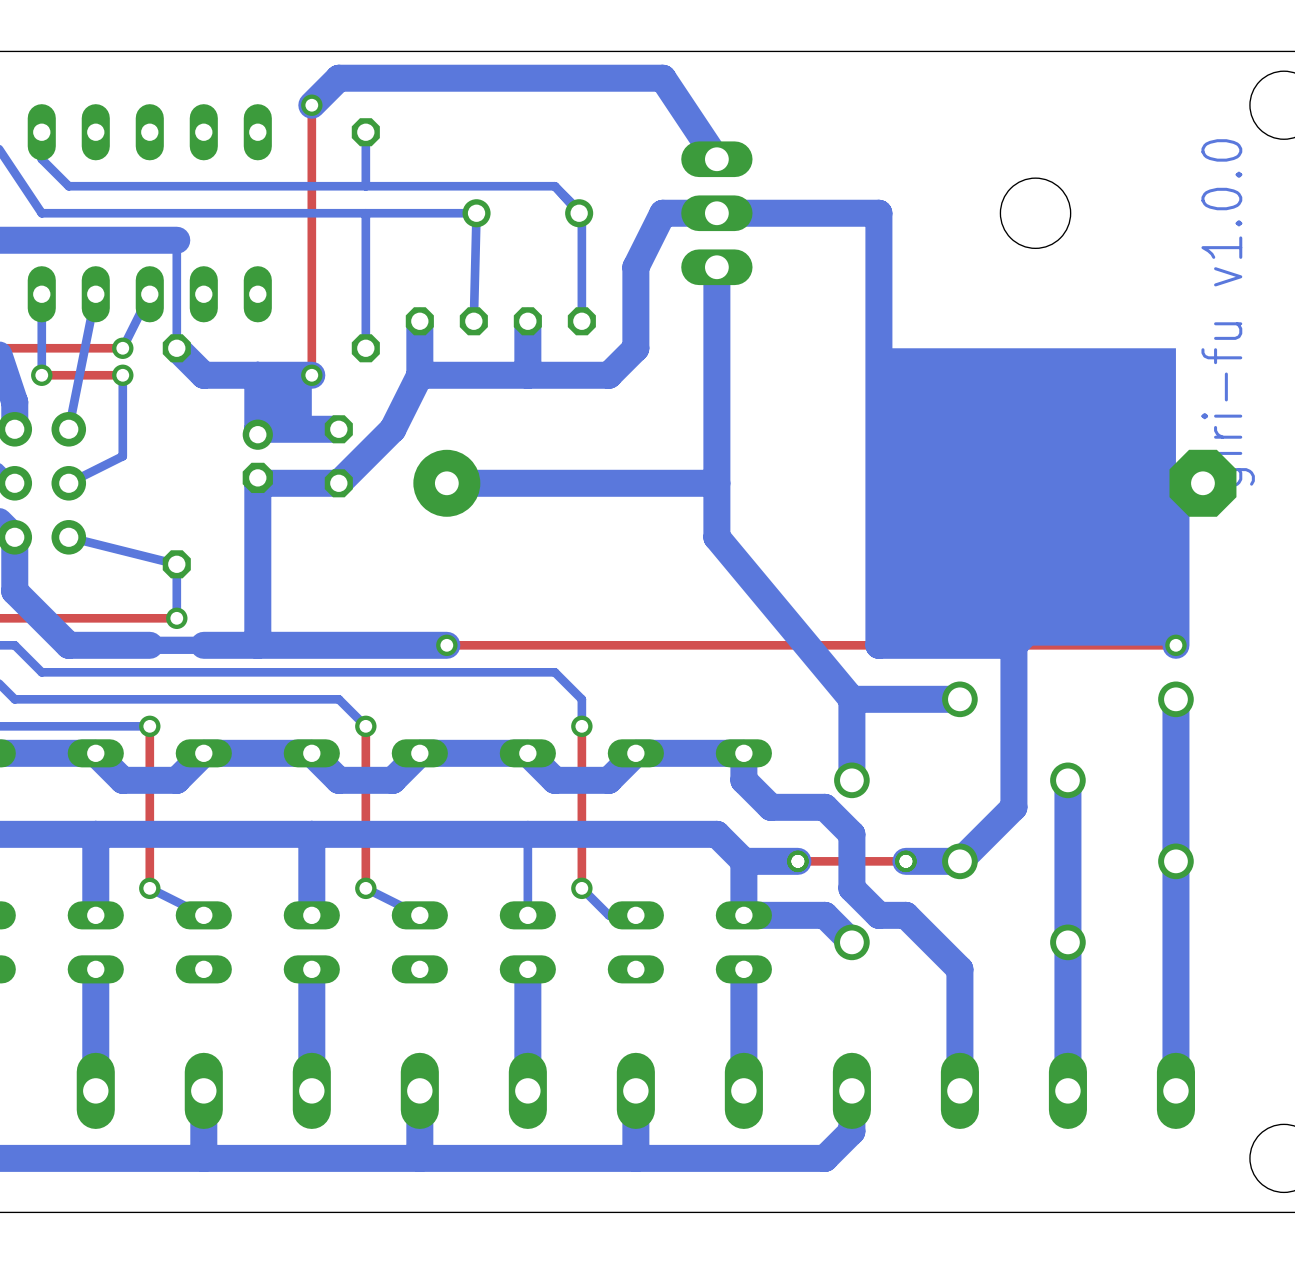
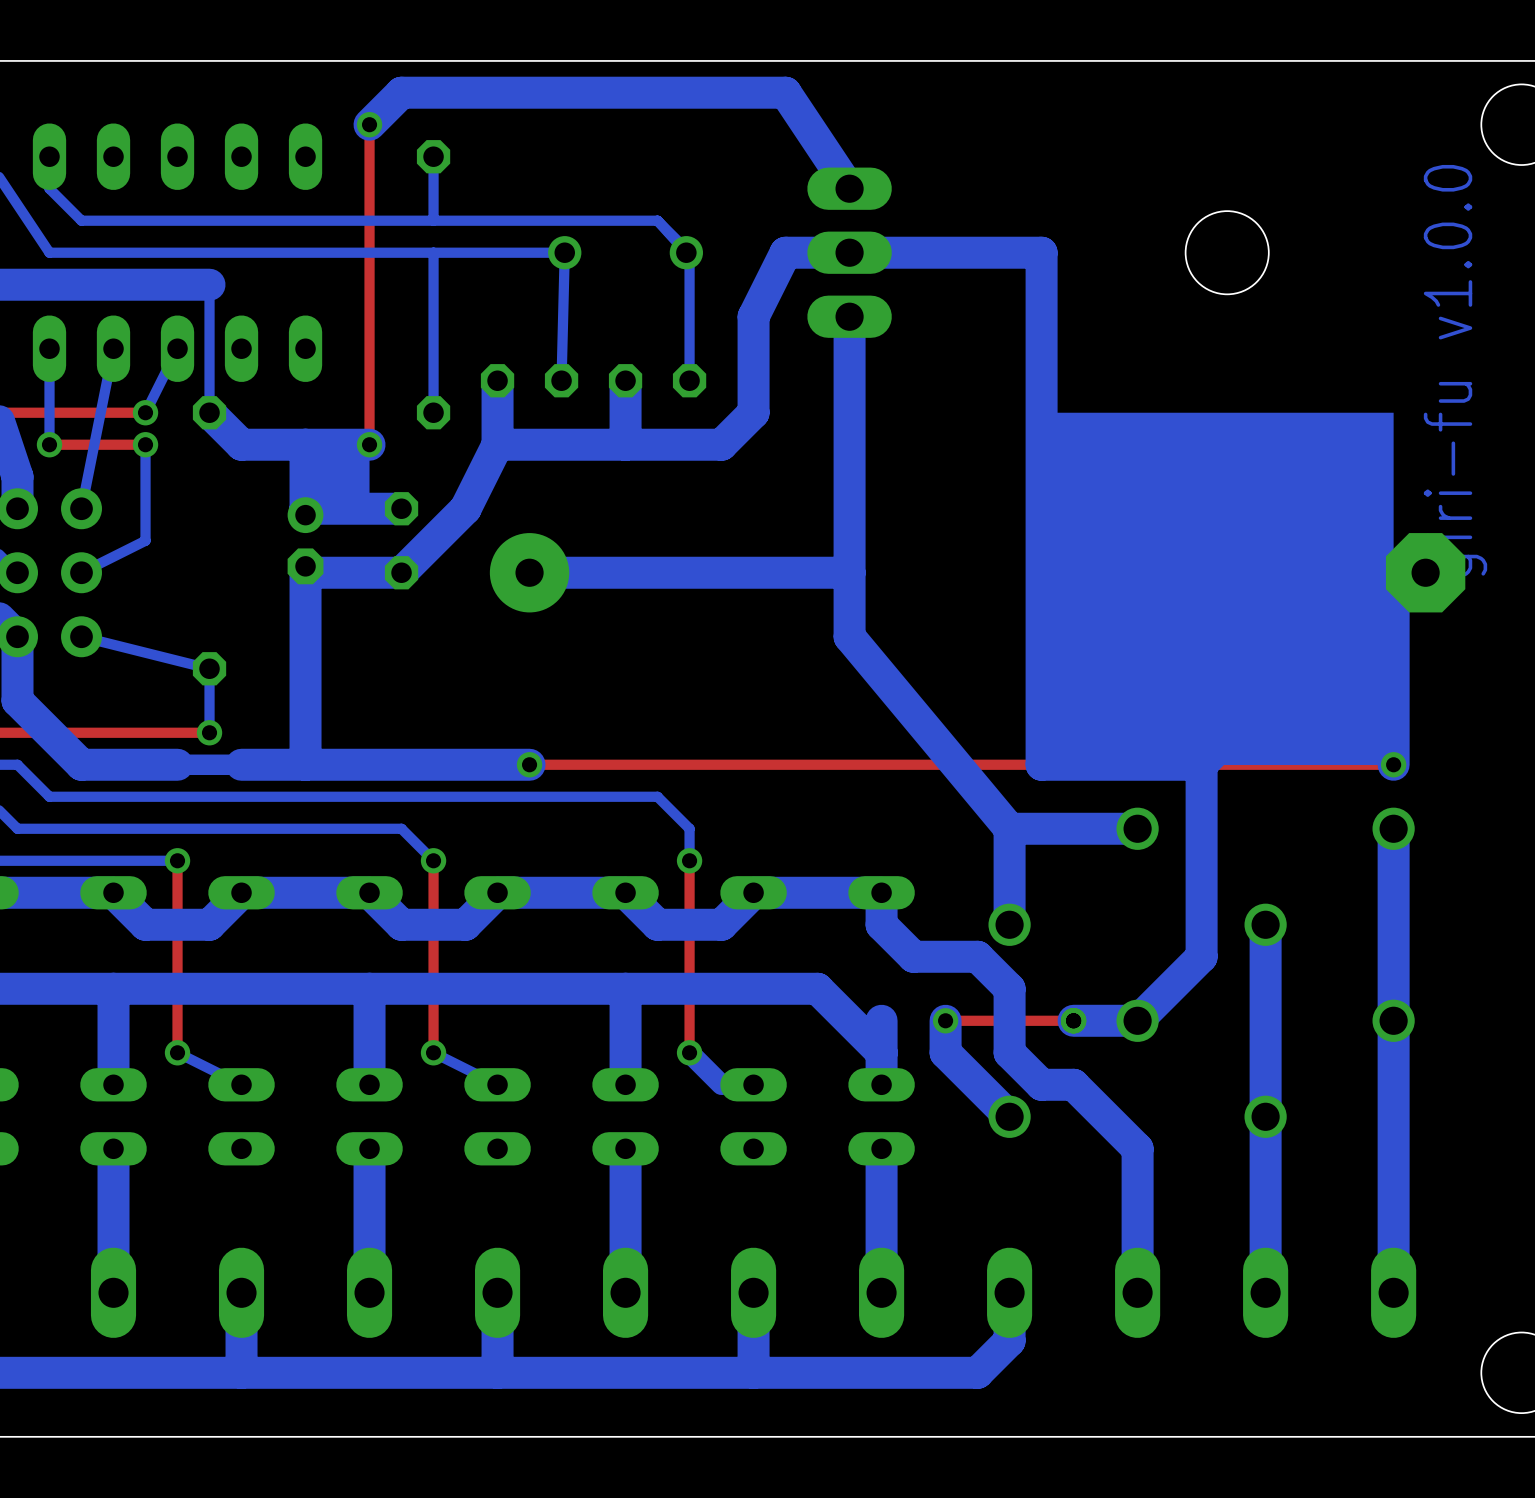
bottom track width: thin (527, 834) (527, 915) -> thick (625, 988) (625, 1084)
bottom track: (689, 834) (716, 834) (743, 861) (797, 861) -> (817, 988) (881, 1052)
bottom track width: thin (581, 888) (608, 915) -> thick (689, 1052) (721, 1084)
bottom track: (824, 915) (743, 915) -> (977, 1084) (945, 1052) (945, 1020)

